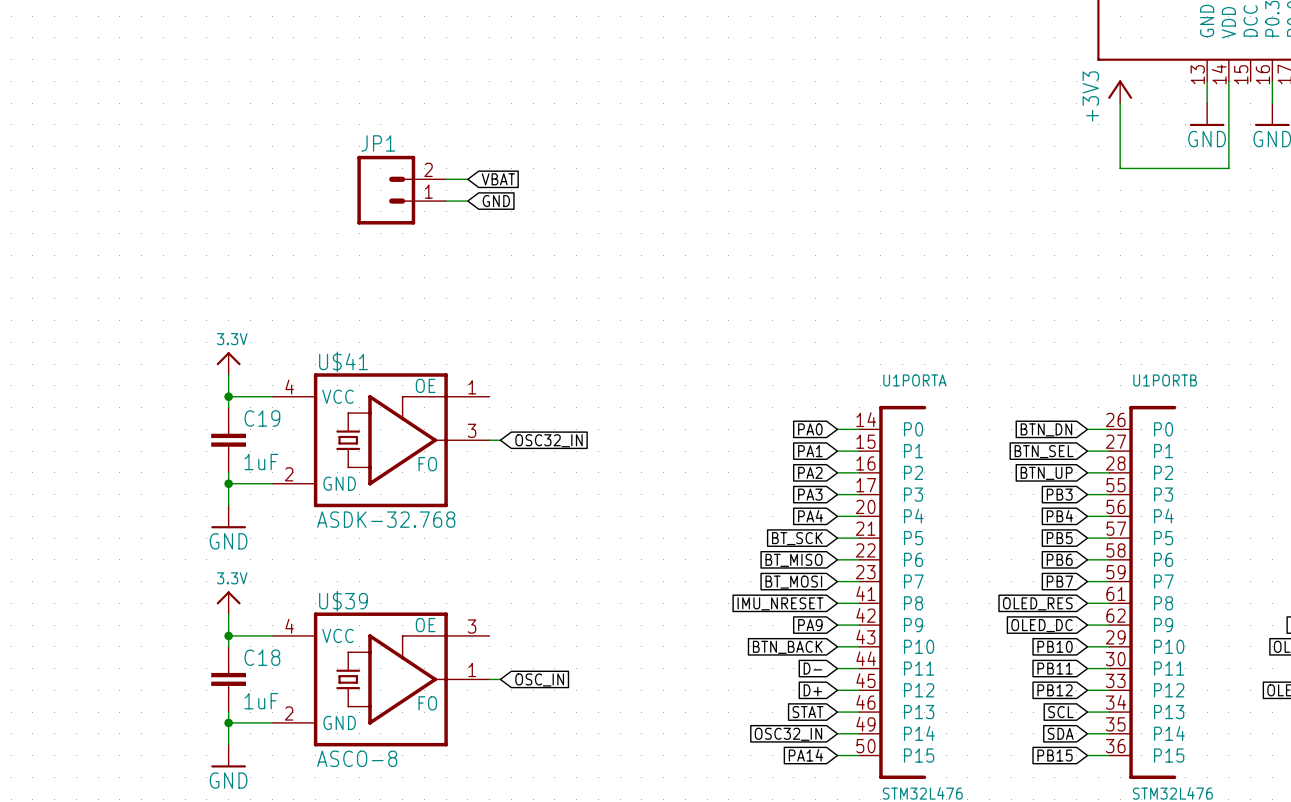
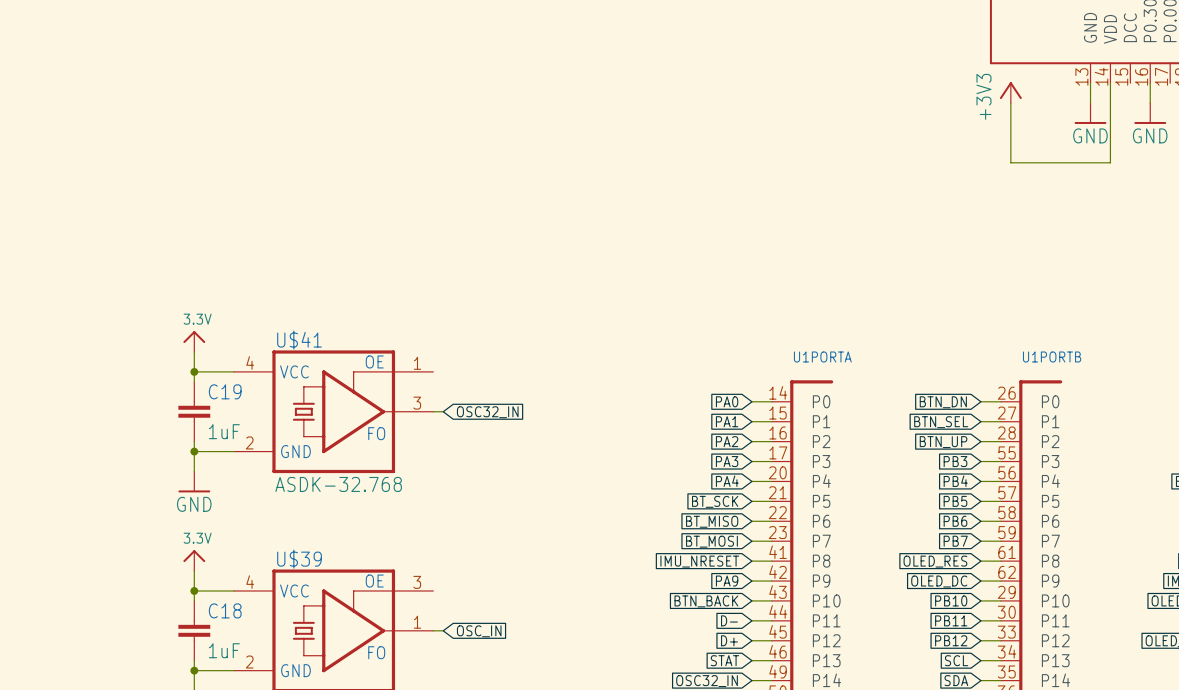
wire: (446, 179) (467, 179) -> none
global label: VBAT (498, 179) -> none
JP1: (401, 190) -> none
wire: (446, 201) (467, 201) -> none
global label: GND (496, 201) -> none

